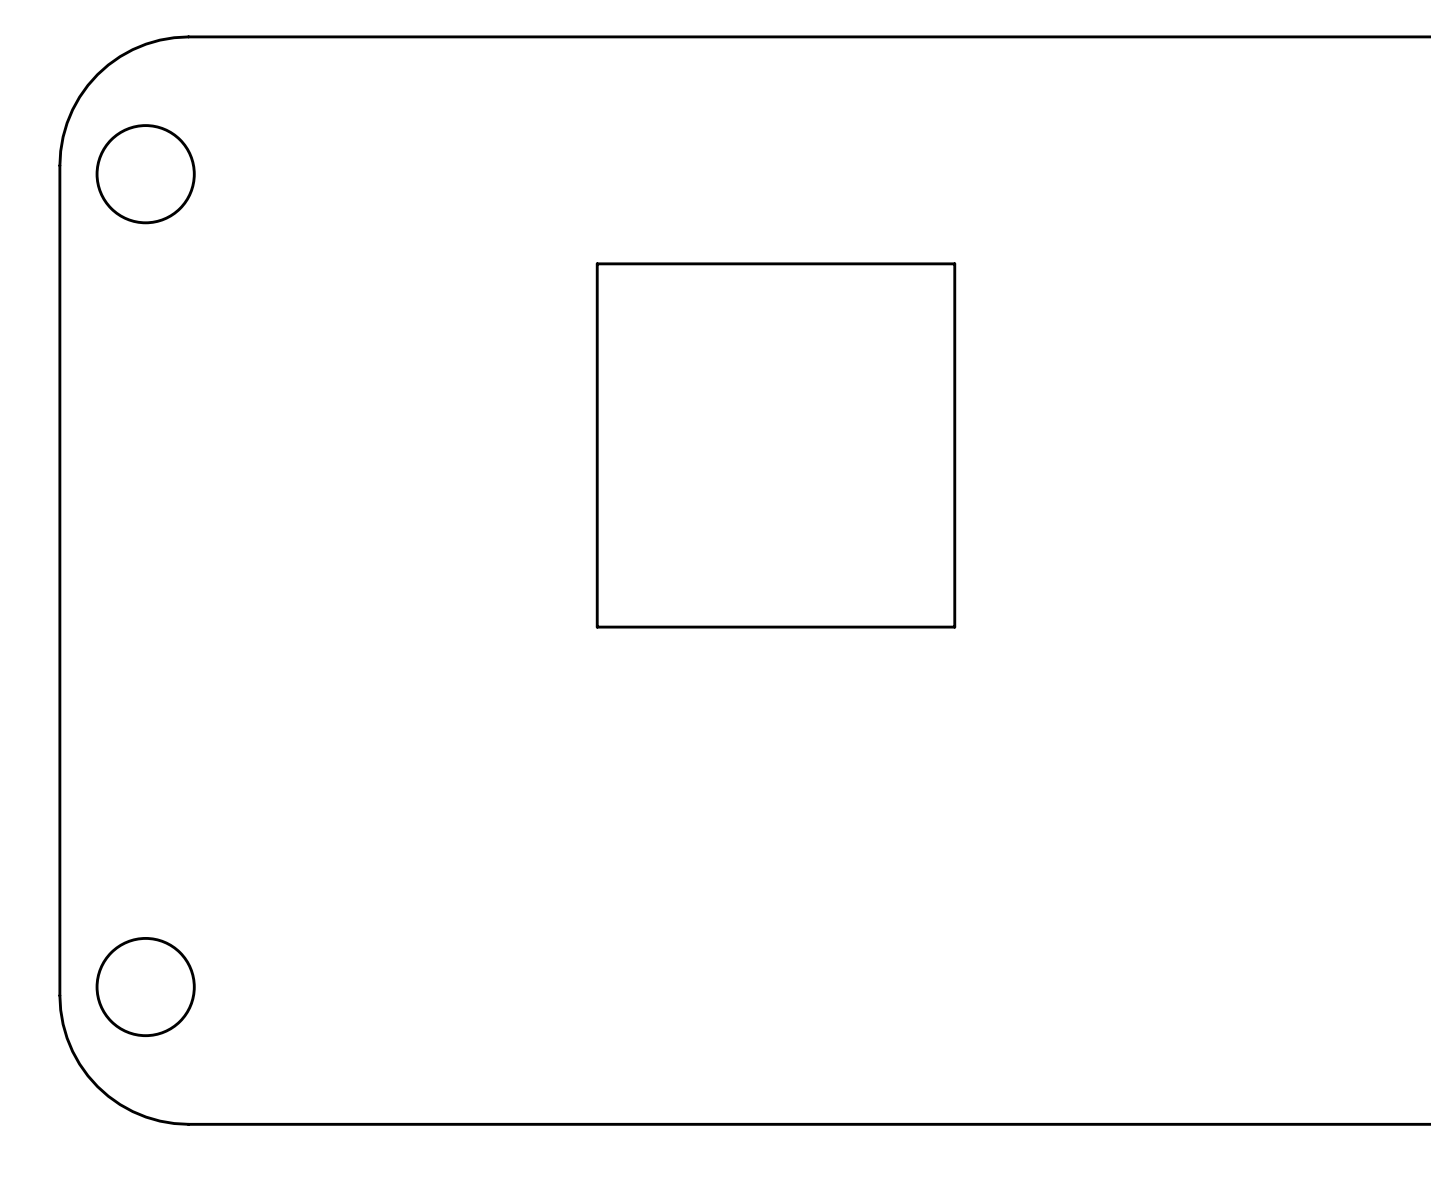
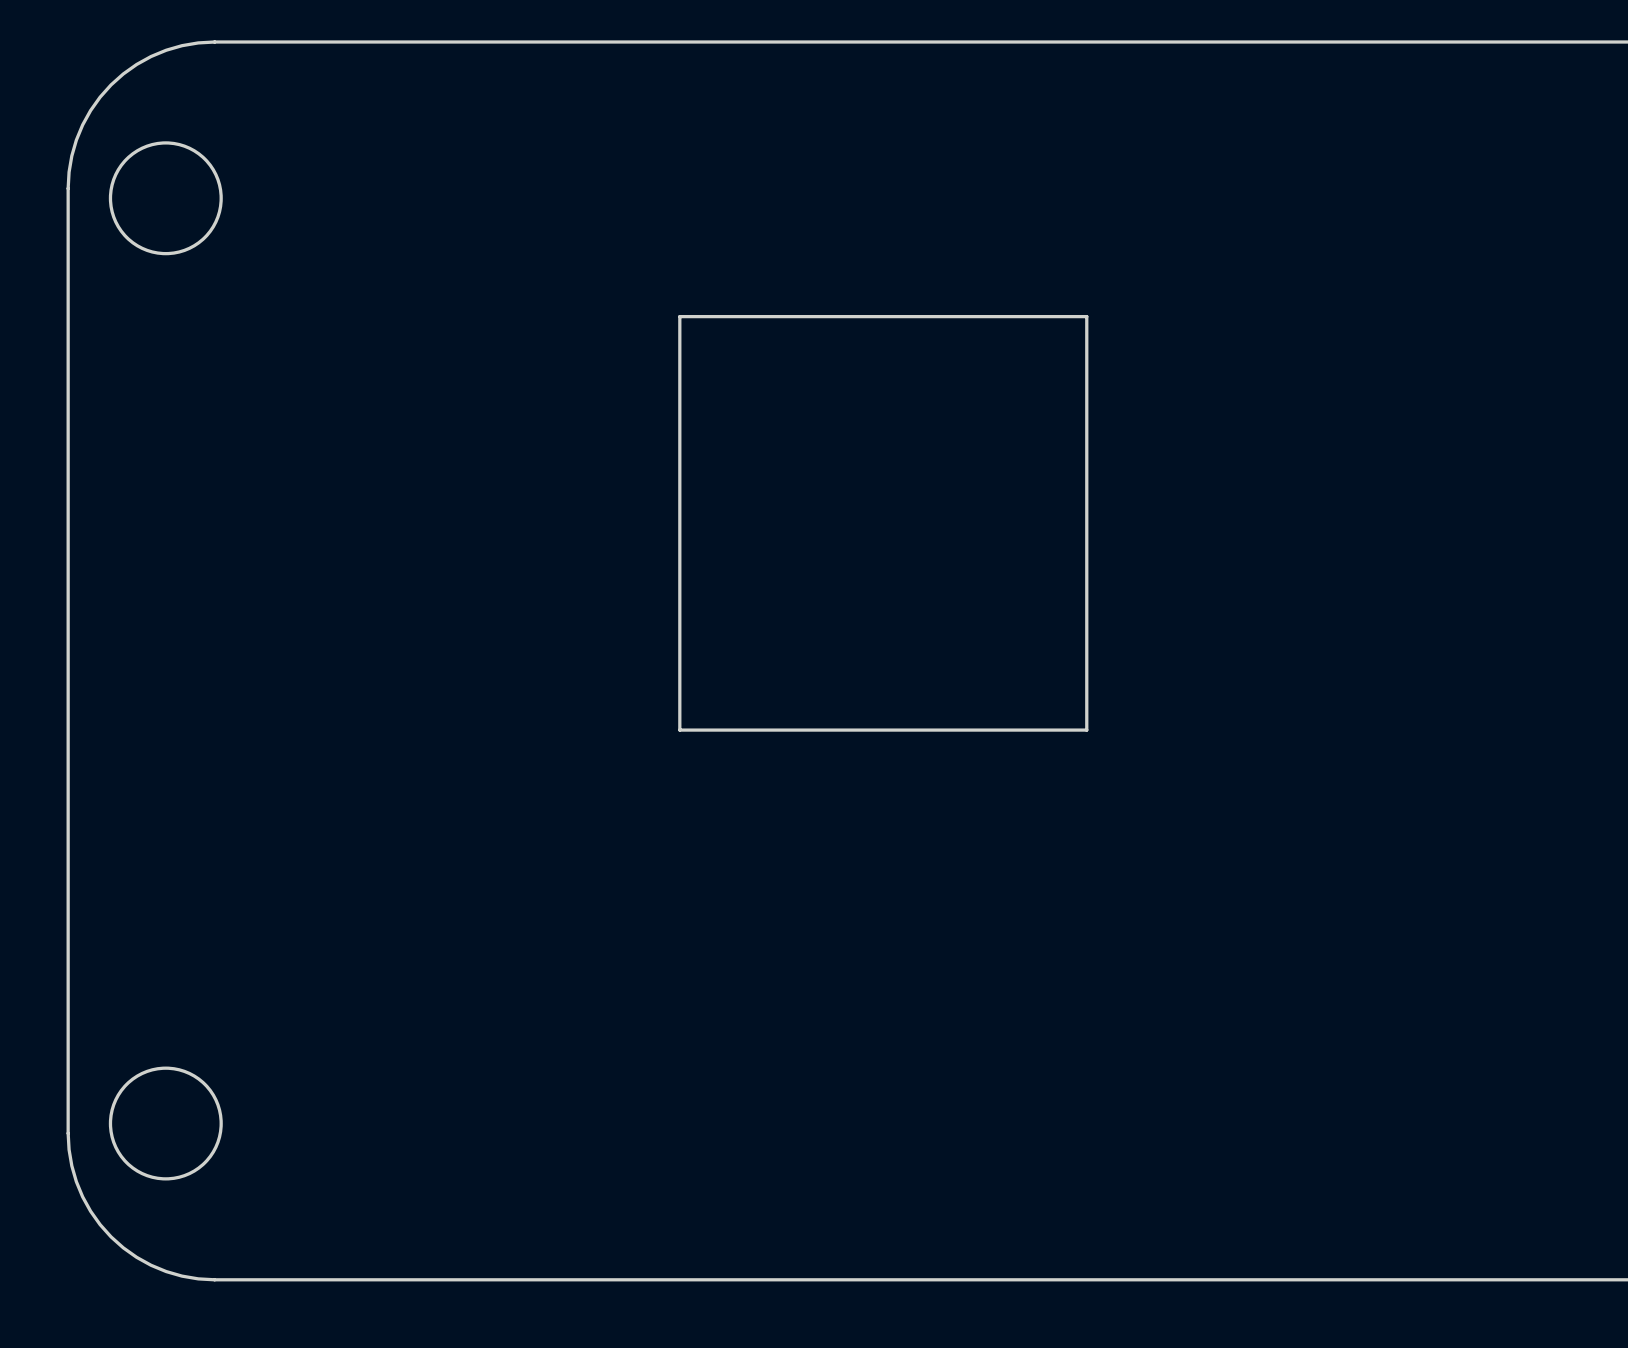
board edge: (597, 278) (597, 263) (954, 263) (954, 278) -> (679, 316) (1086, 316)
board edge: (597, 627) (954, 627) -> (679, 713) (679, 730) (1086, 730) (1086, 713)

